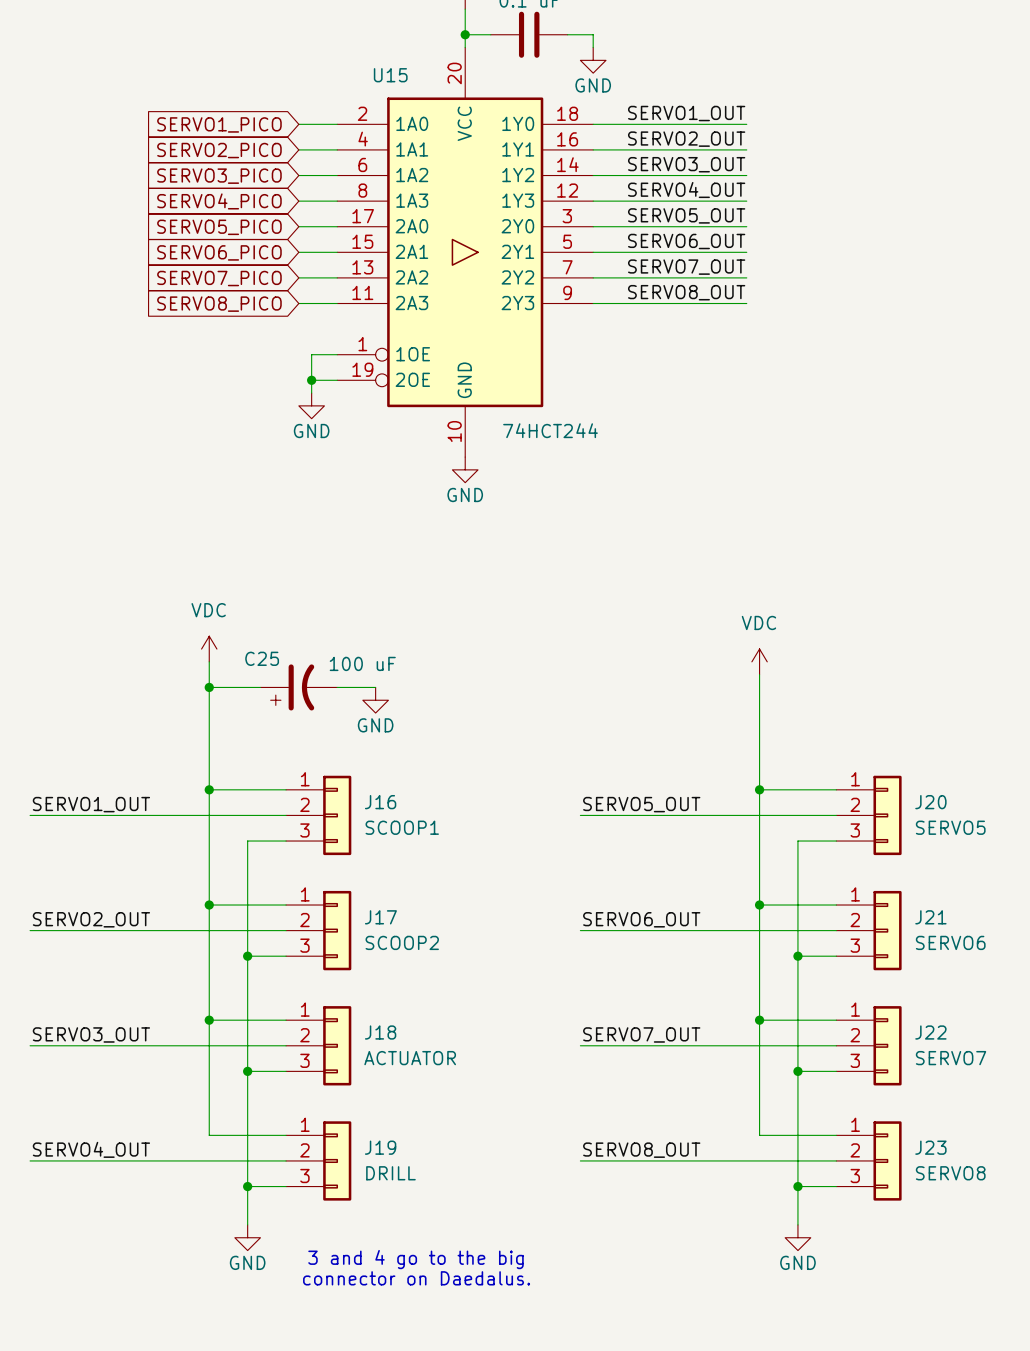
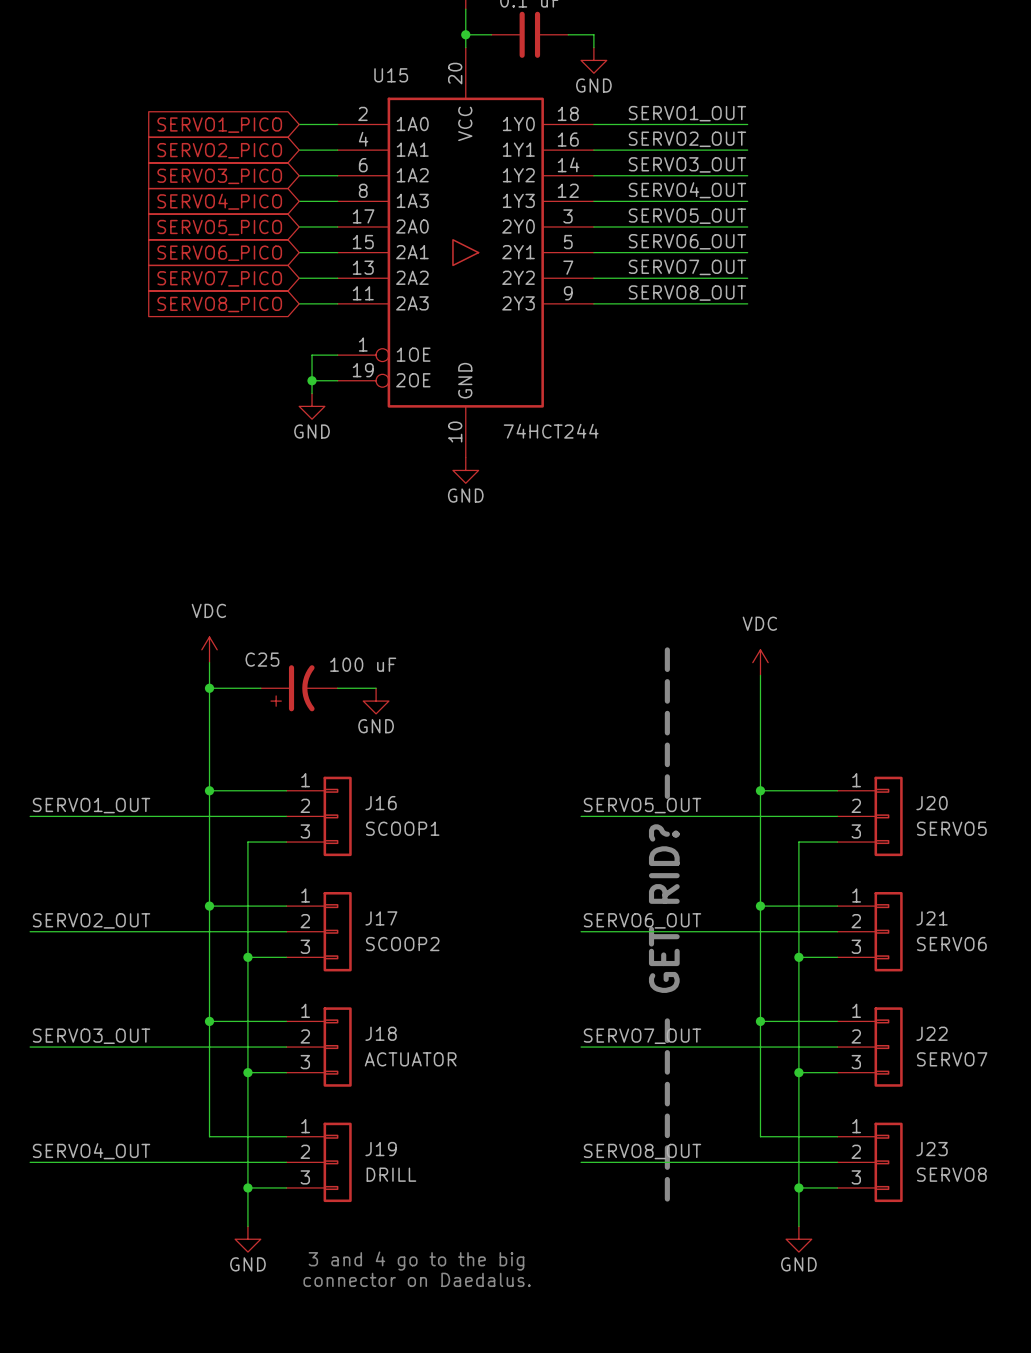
text: none -> ------ GET RID? ----- (664, 924)

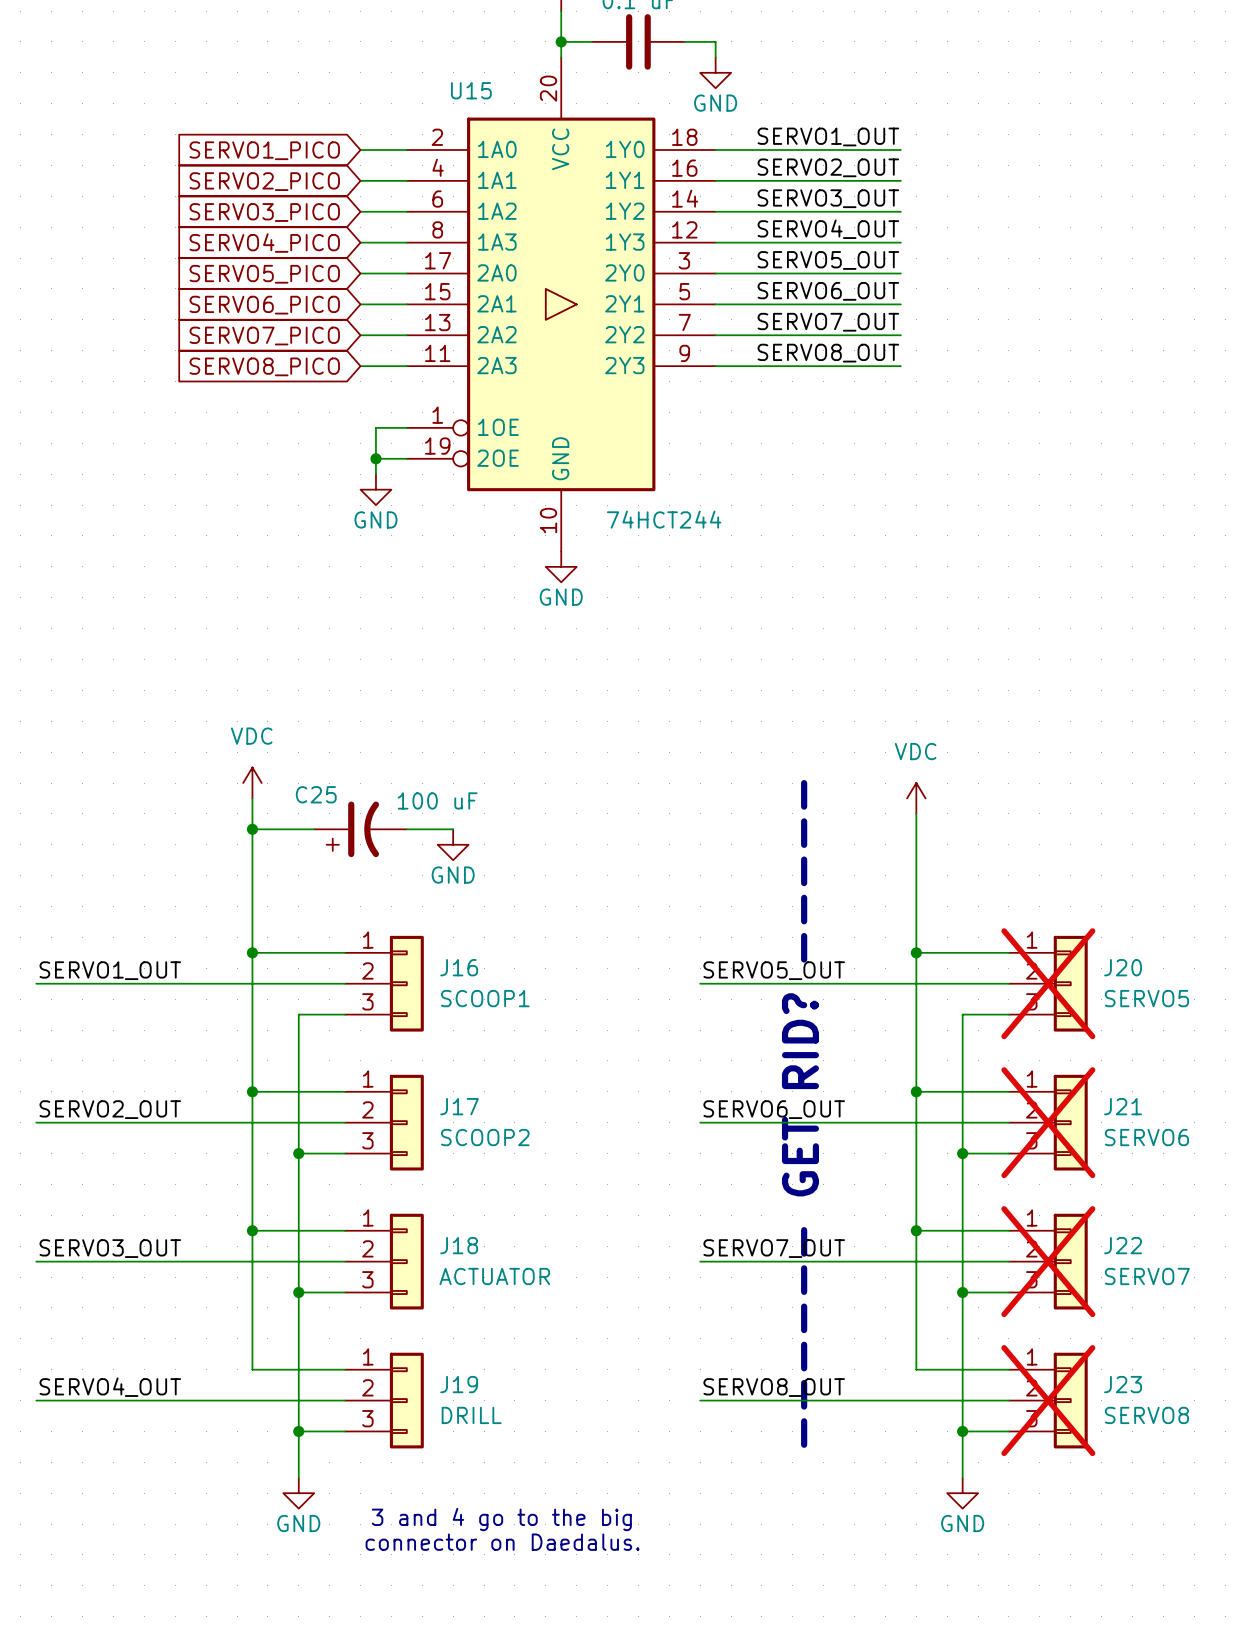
J20 do-not-place cross: none -> (1048, 983)
J21 do-not-place cross: none -> (1048, 1122)
J22 do-not-place cross: none -> (1048, 1261)
J23 do-not-place cross: none -> (1048, 1400)

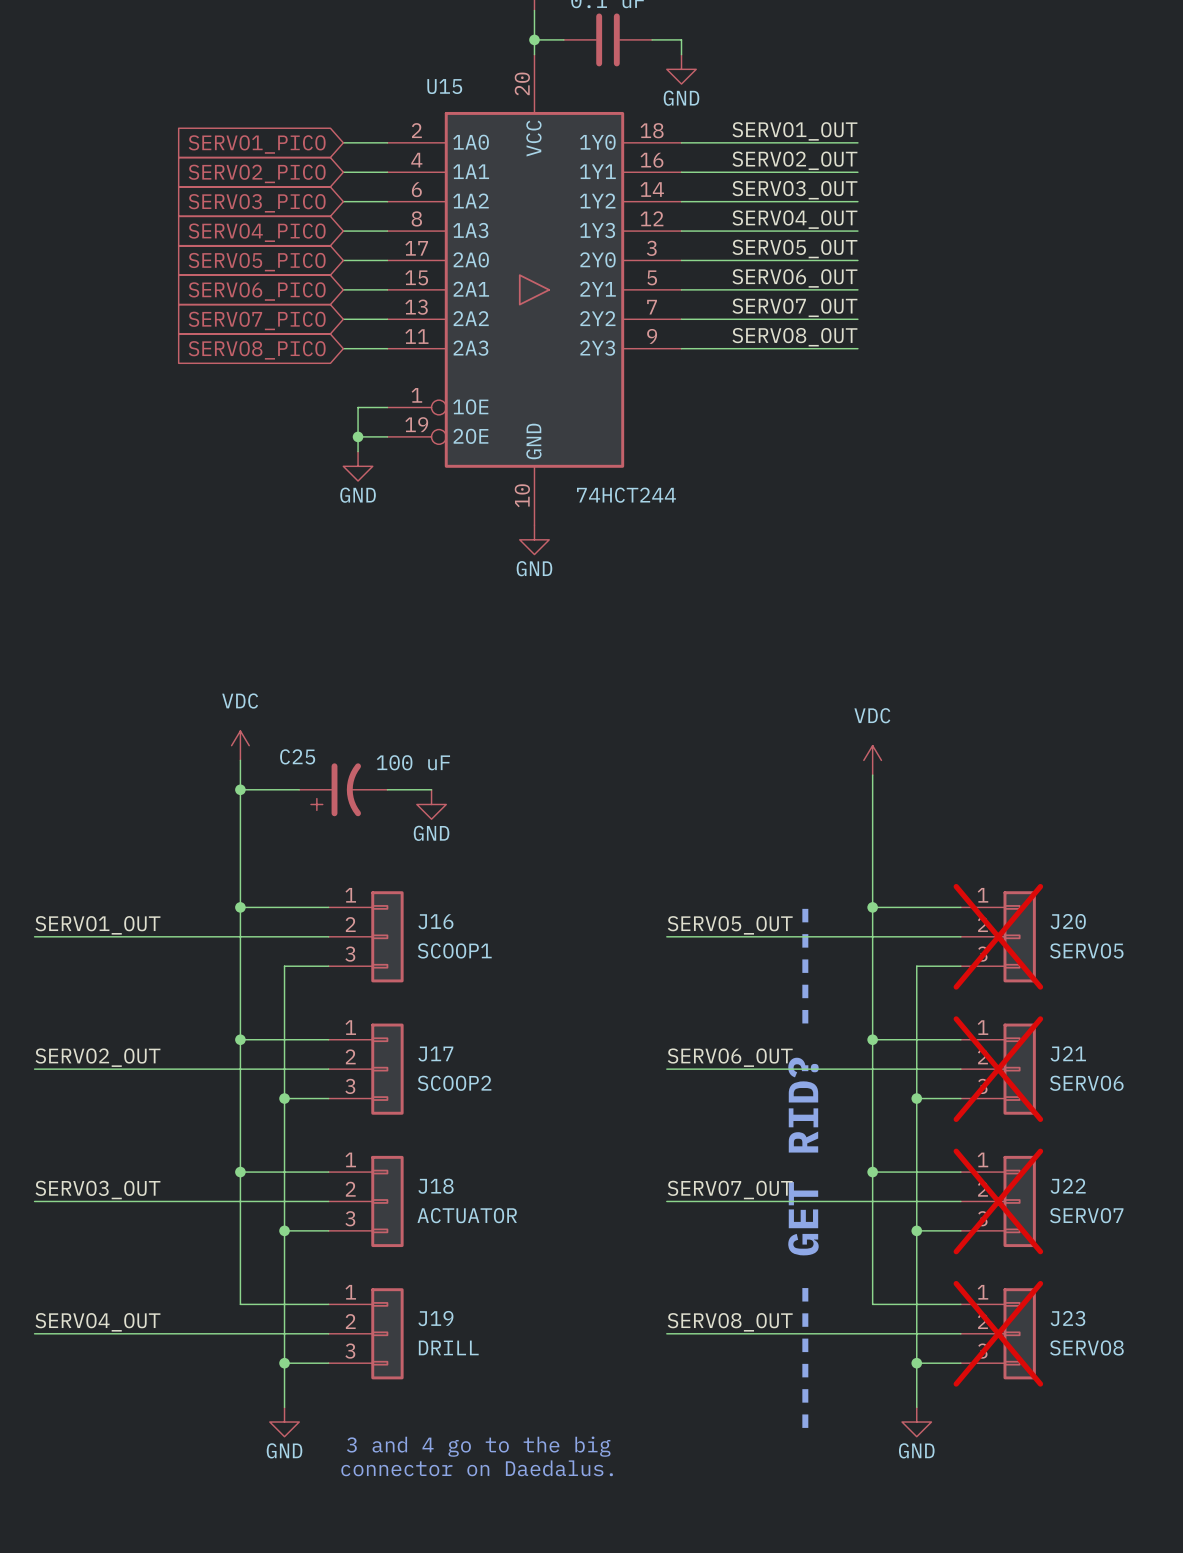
text position: ------ GET RID? ----- (800, 1113) -> ------ GET RID? ----- (803, 1168)

